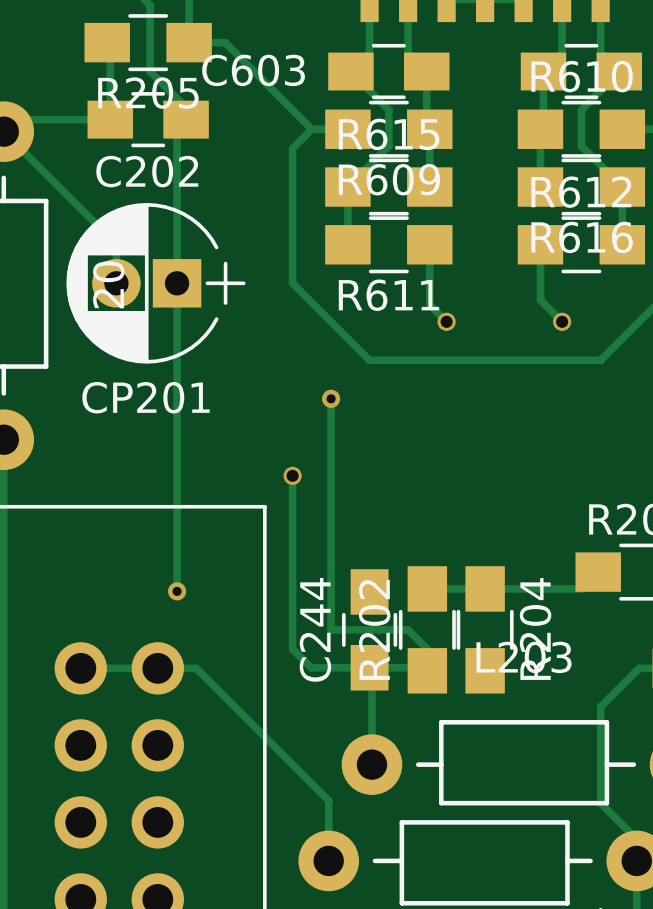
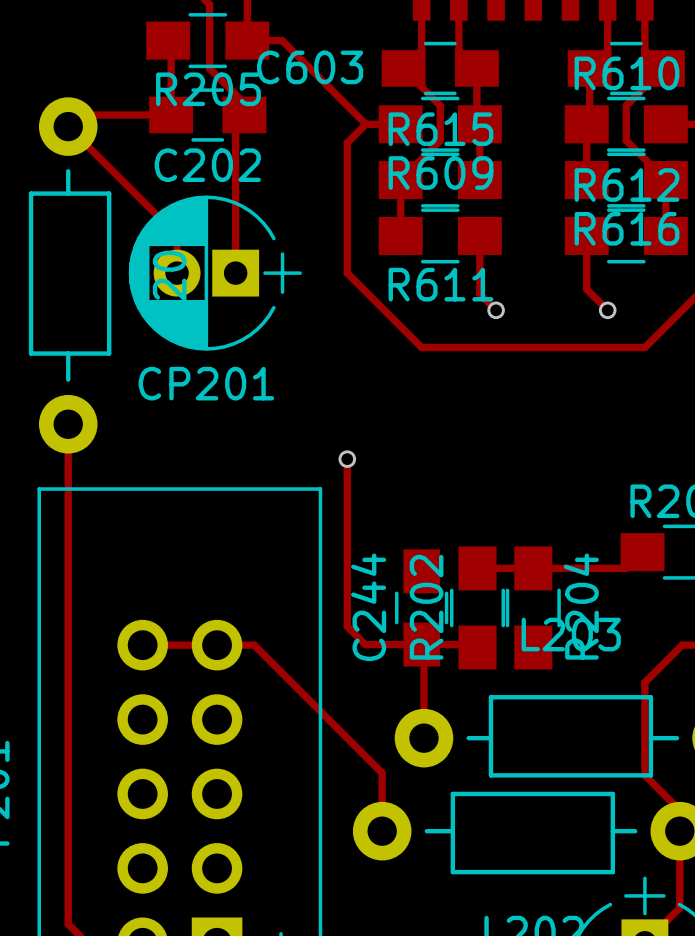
track: (177, 283) (177, 591) -> none
track: (331, 398) (331, 629) (408, 629) (427, 649) (427, 670) -> none
via: (331, 398) -> none
via: (177, 591) -> none

